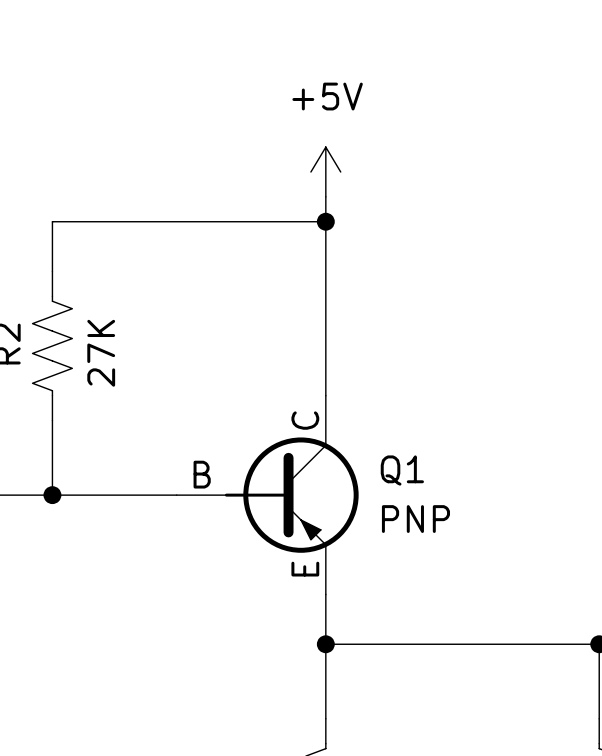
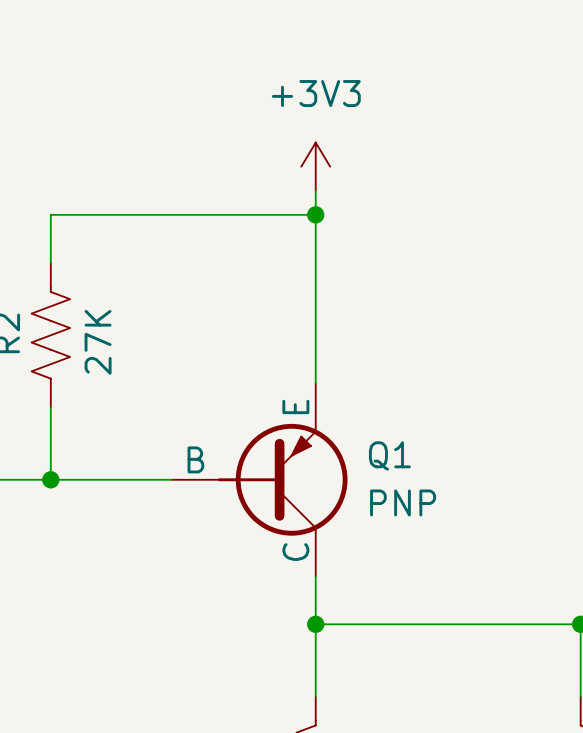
power symbol: +5V (325, 172) -> +3V3 (315, 166)
Q1 flip: as is (291, 495) -> up-down (282, 479)

